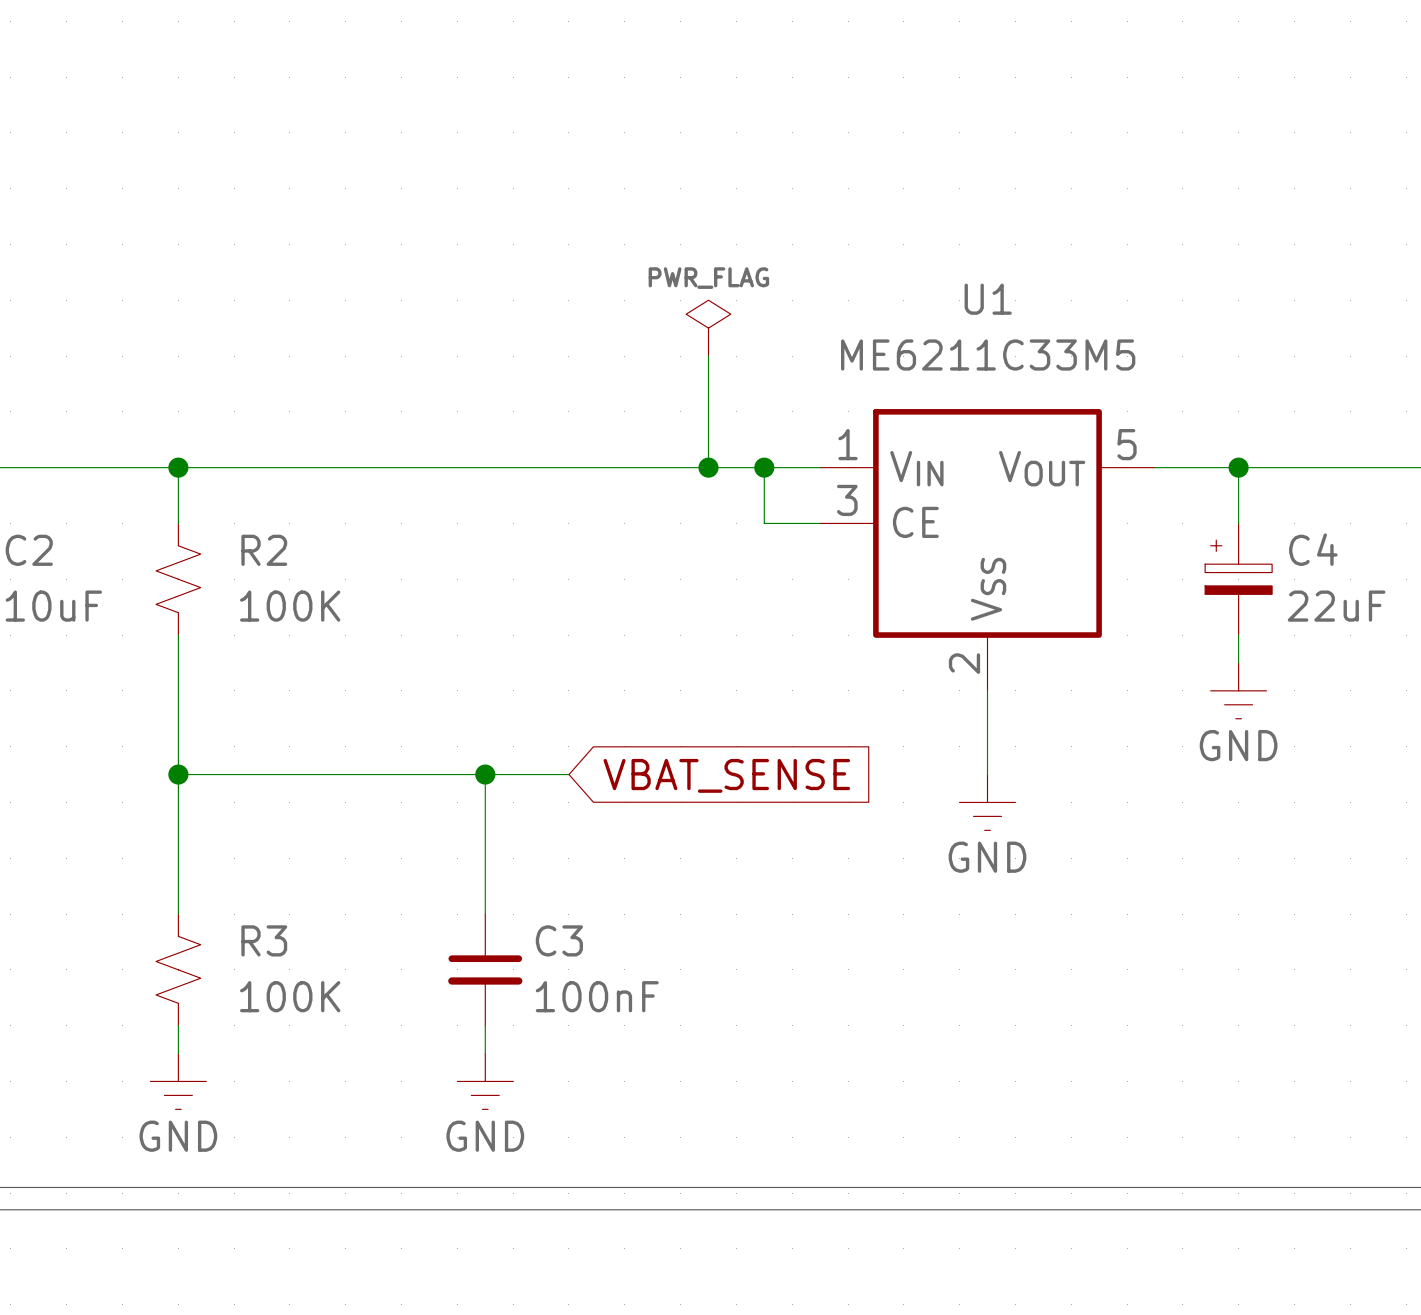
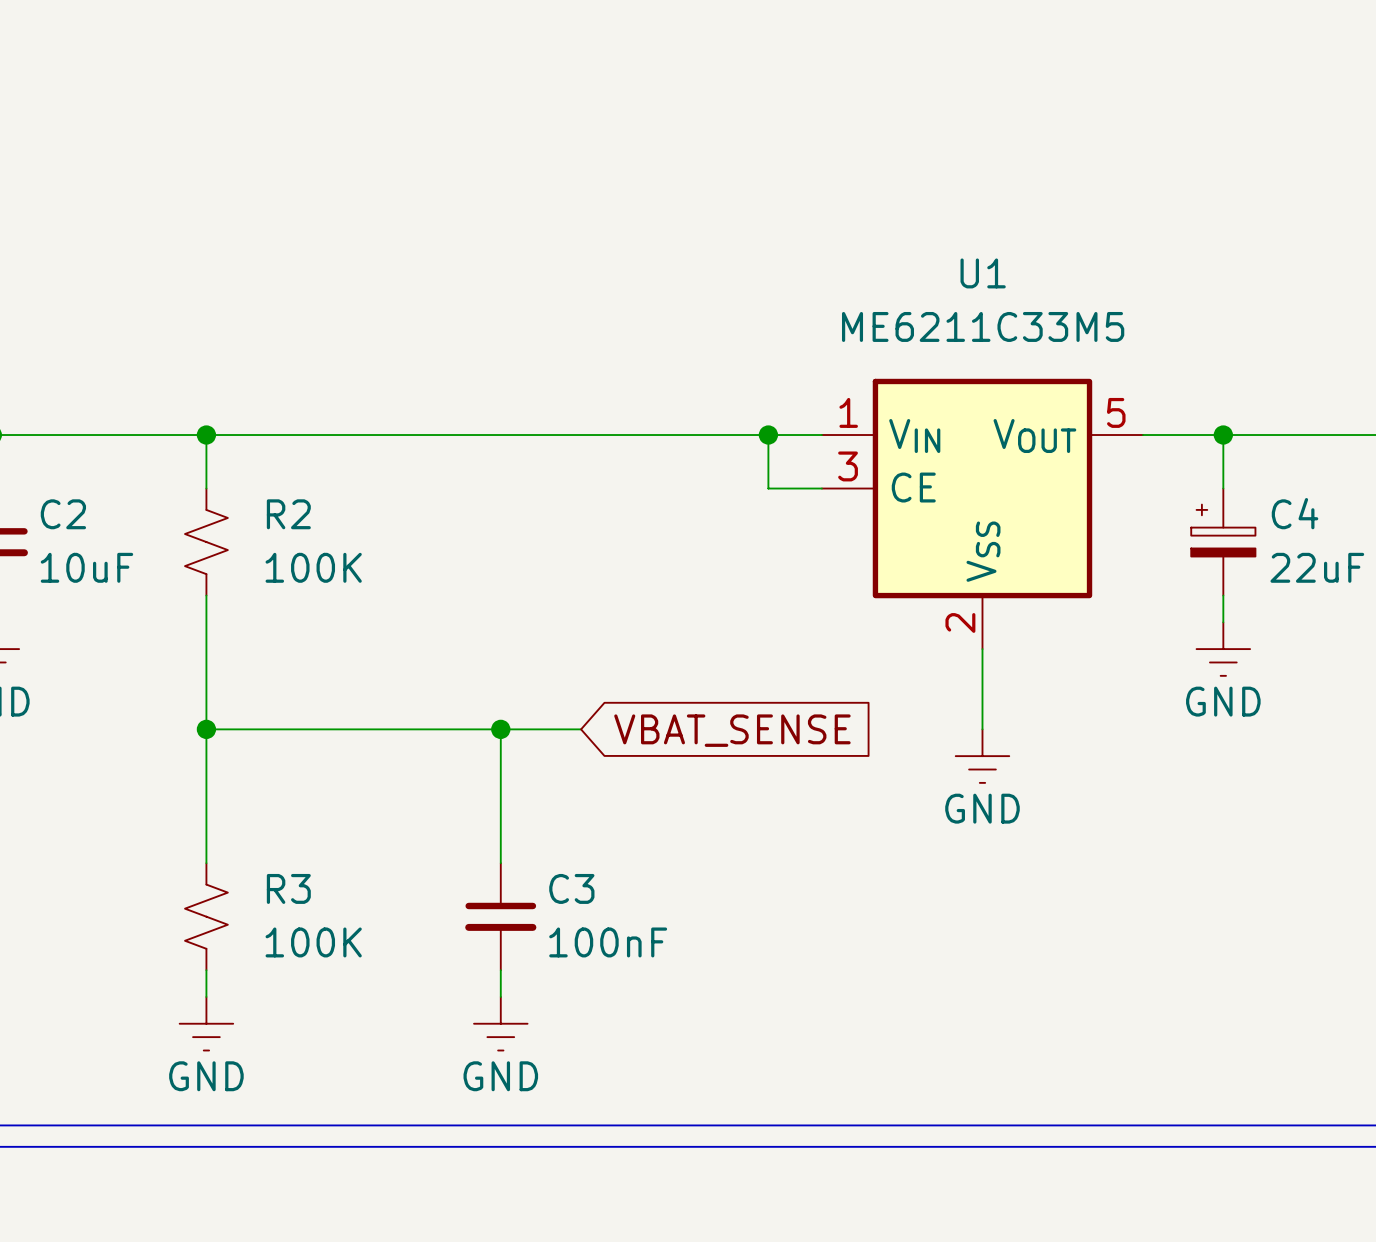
power symbol: PWR_FLAG (708, 328) -> none
wire: (708, 356) (708, 467) -> none
junction: (708, 467) -> none

